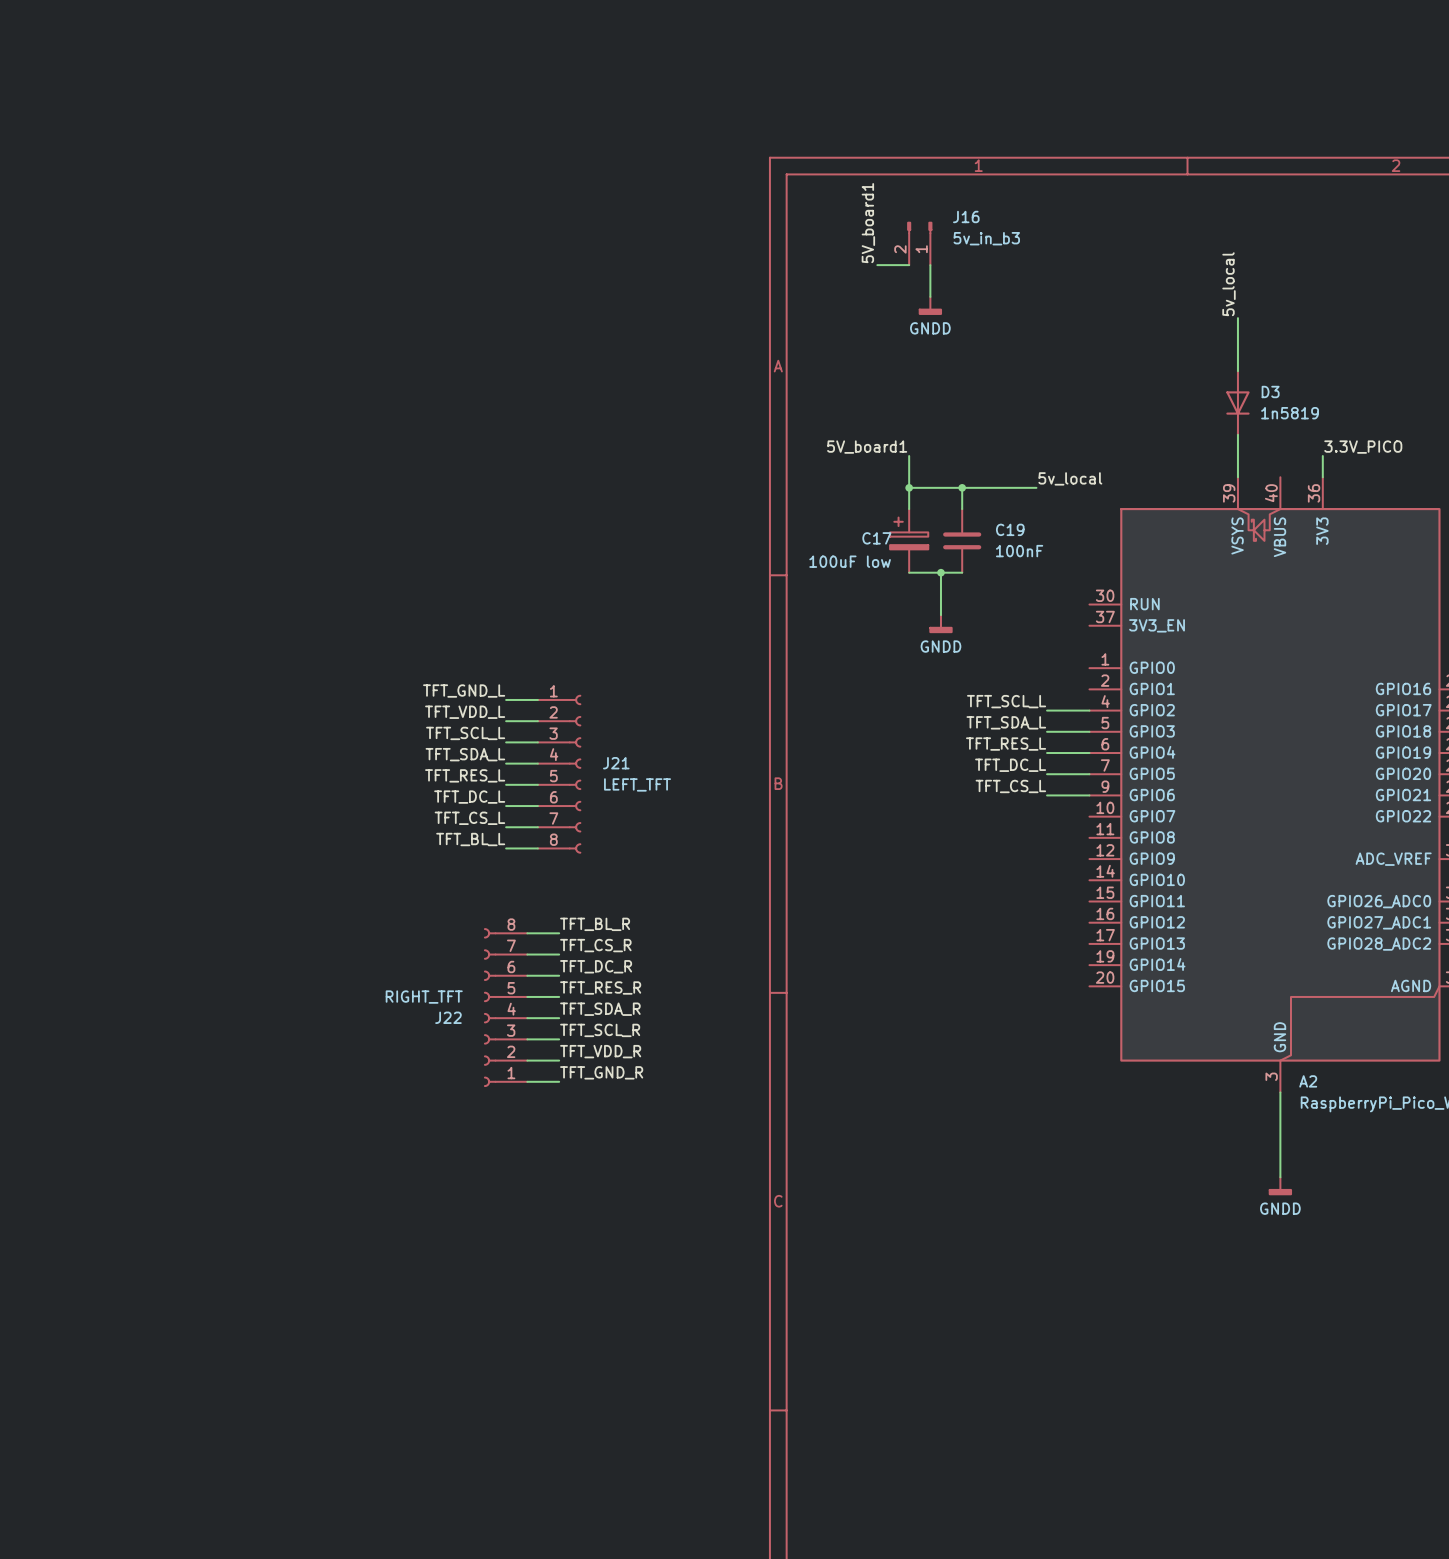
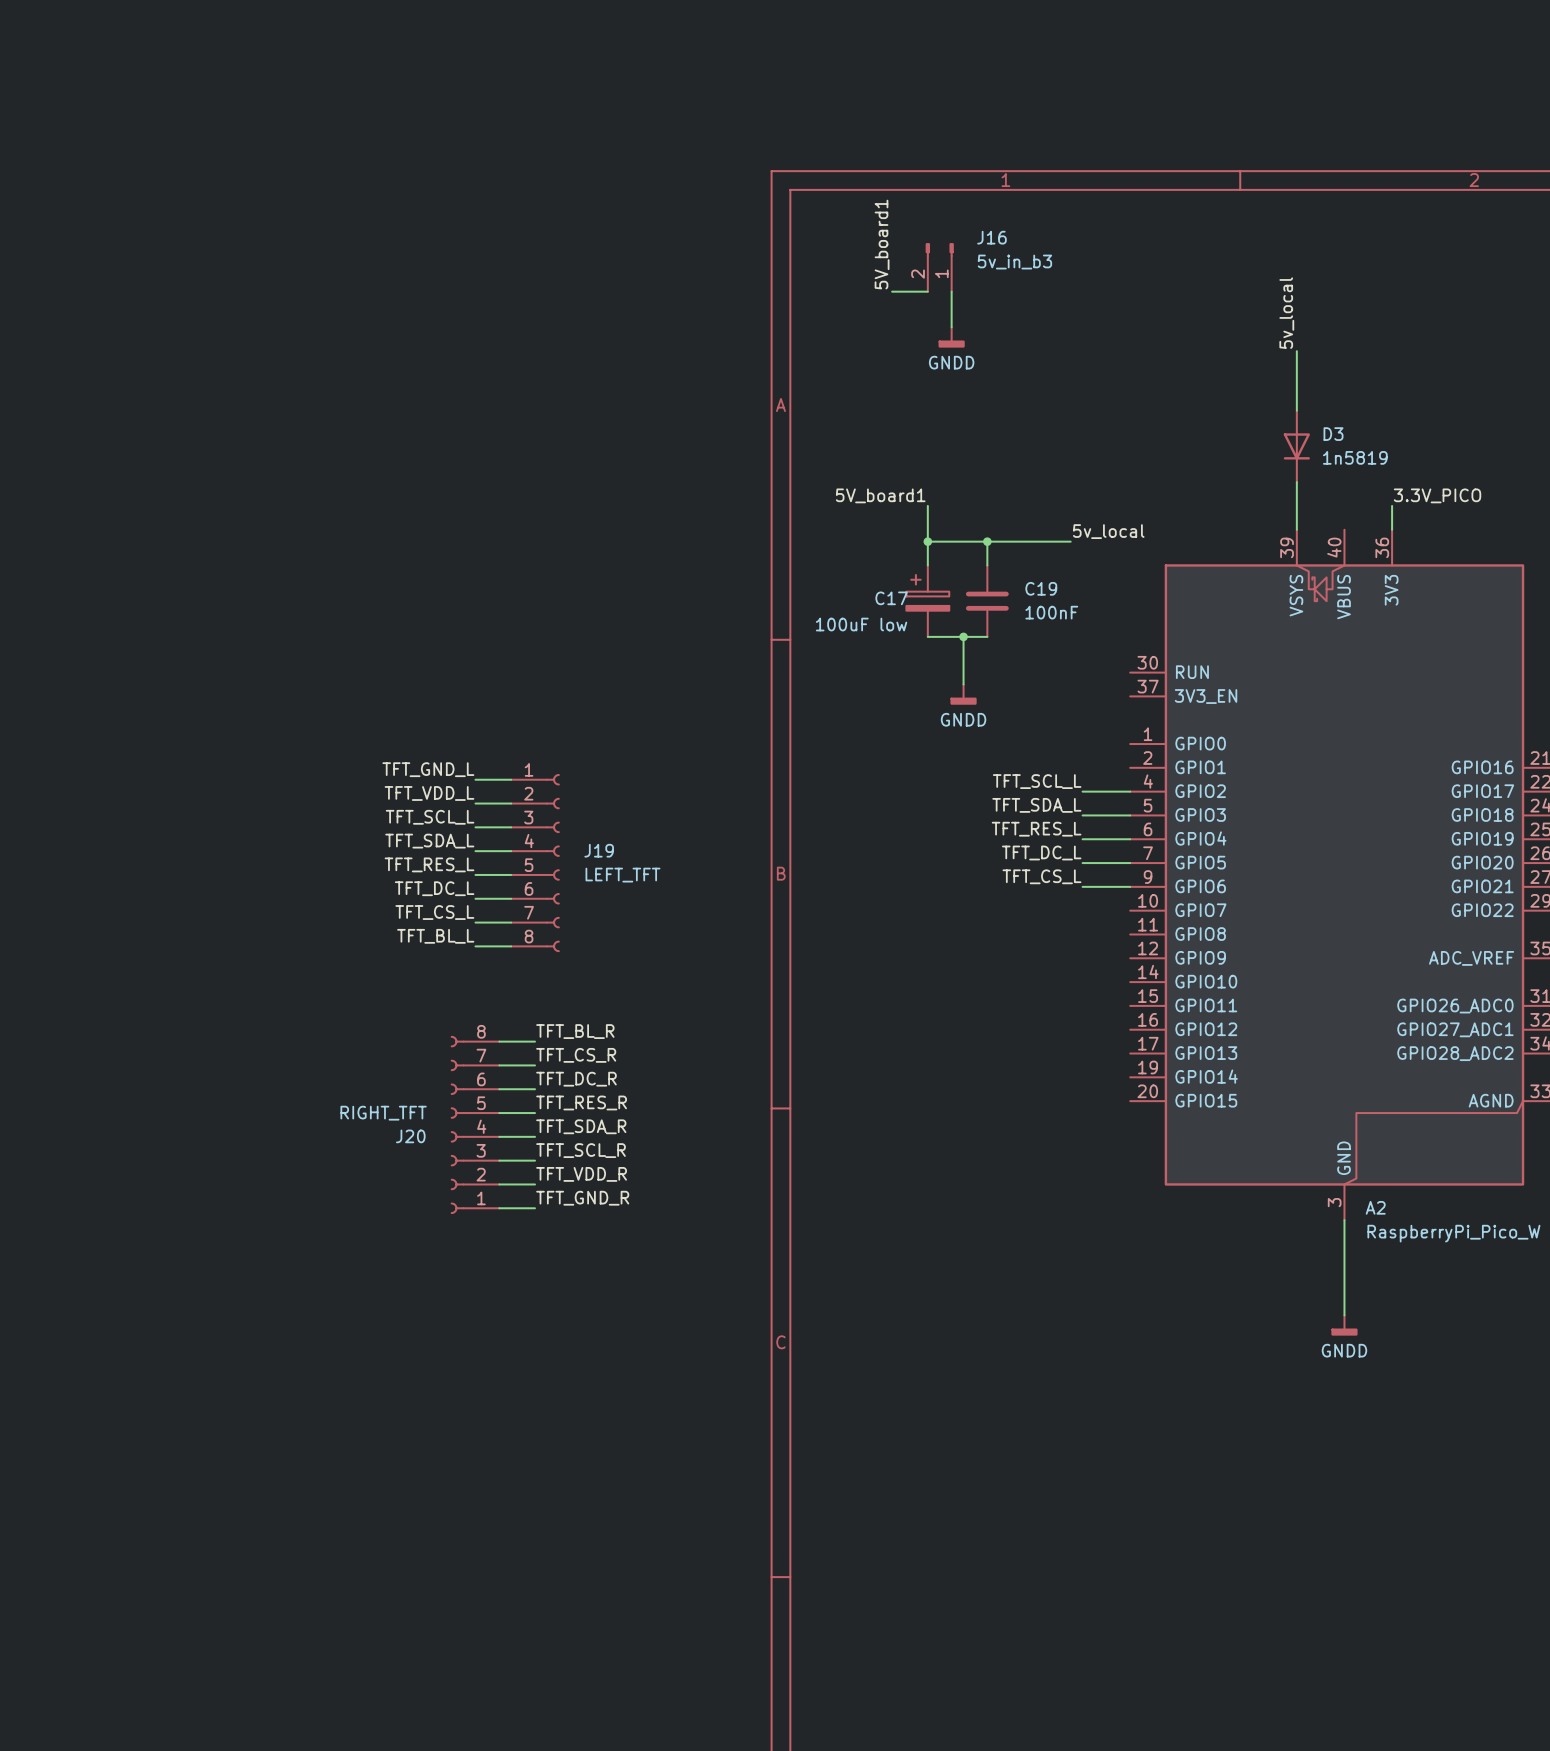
J21 name: J21 (616, 763) -> J19 (599, 850)
J22 name: J22 (448, 1017) -> J20 (410, 1136)

